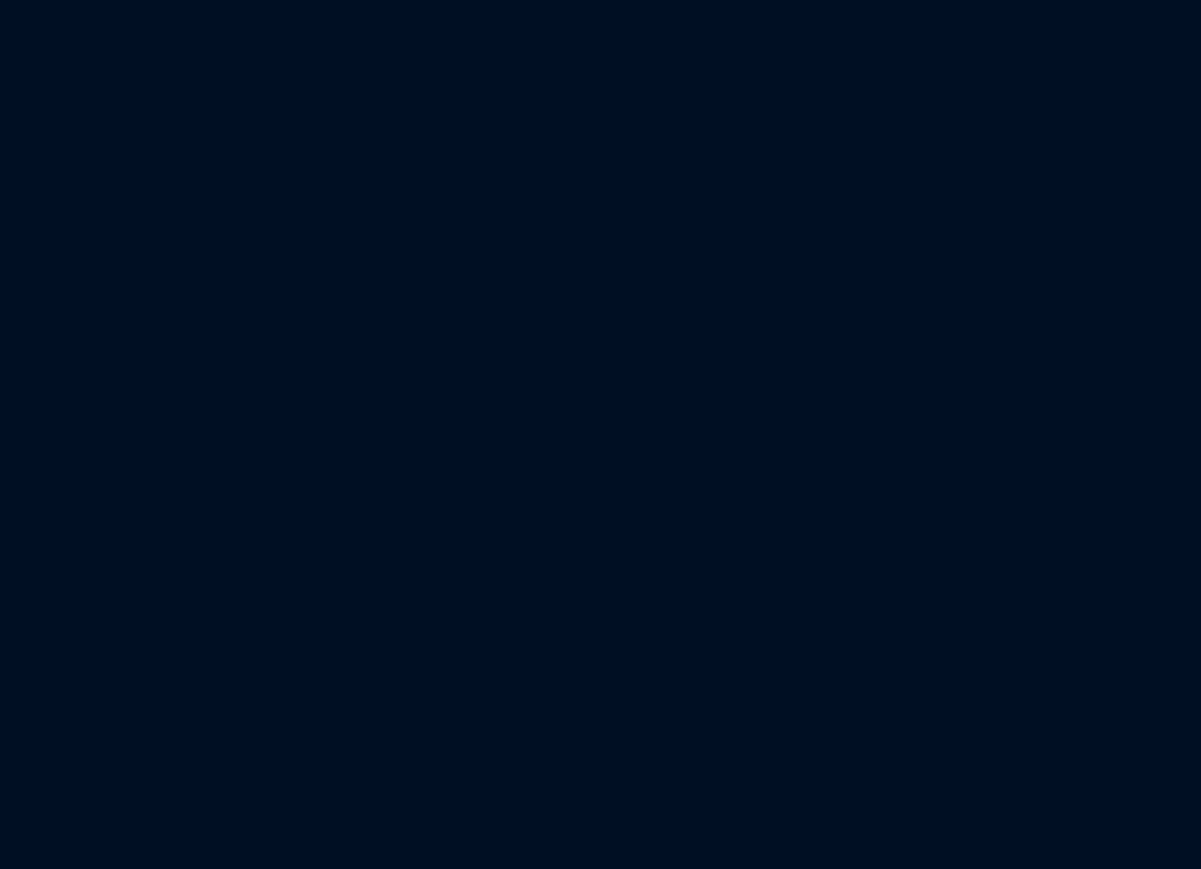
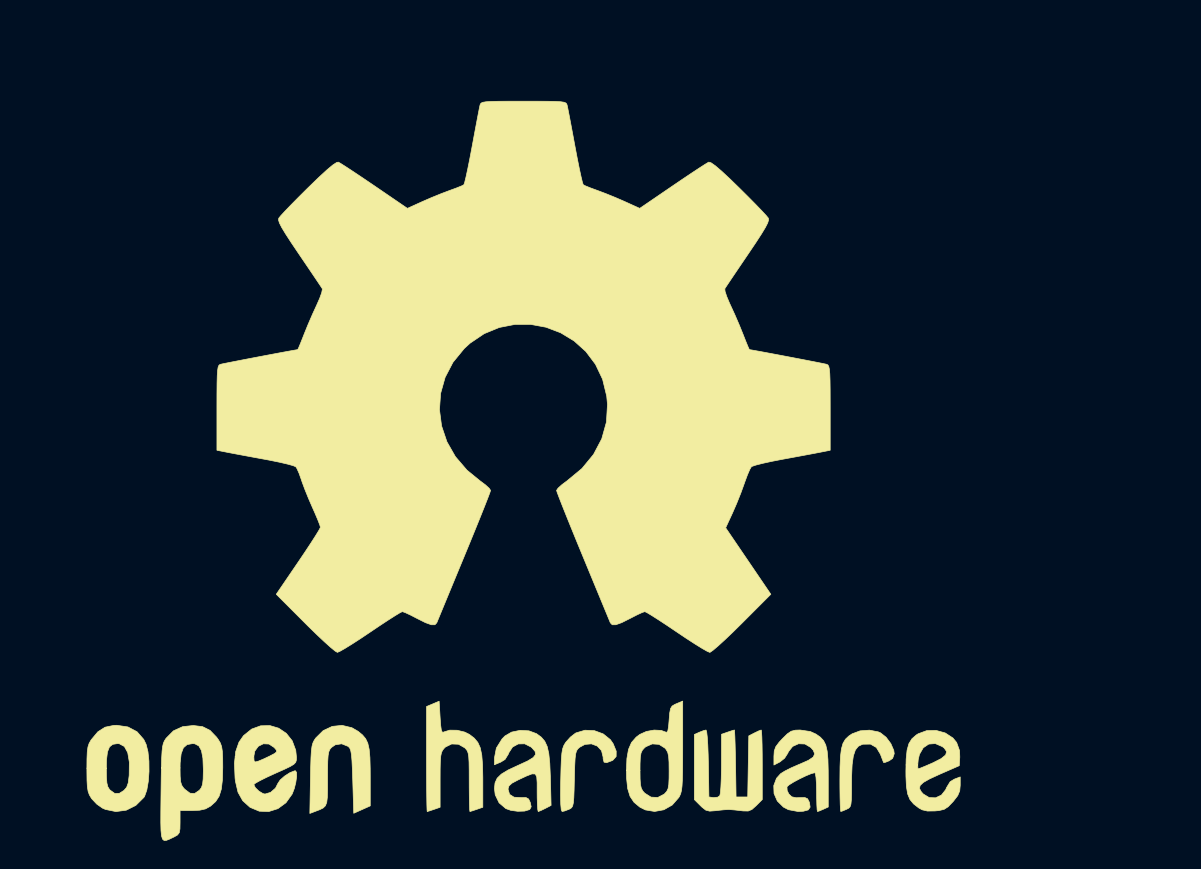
drawing: none -> [86, 100, 961, 841]

